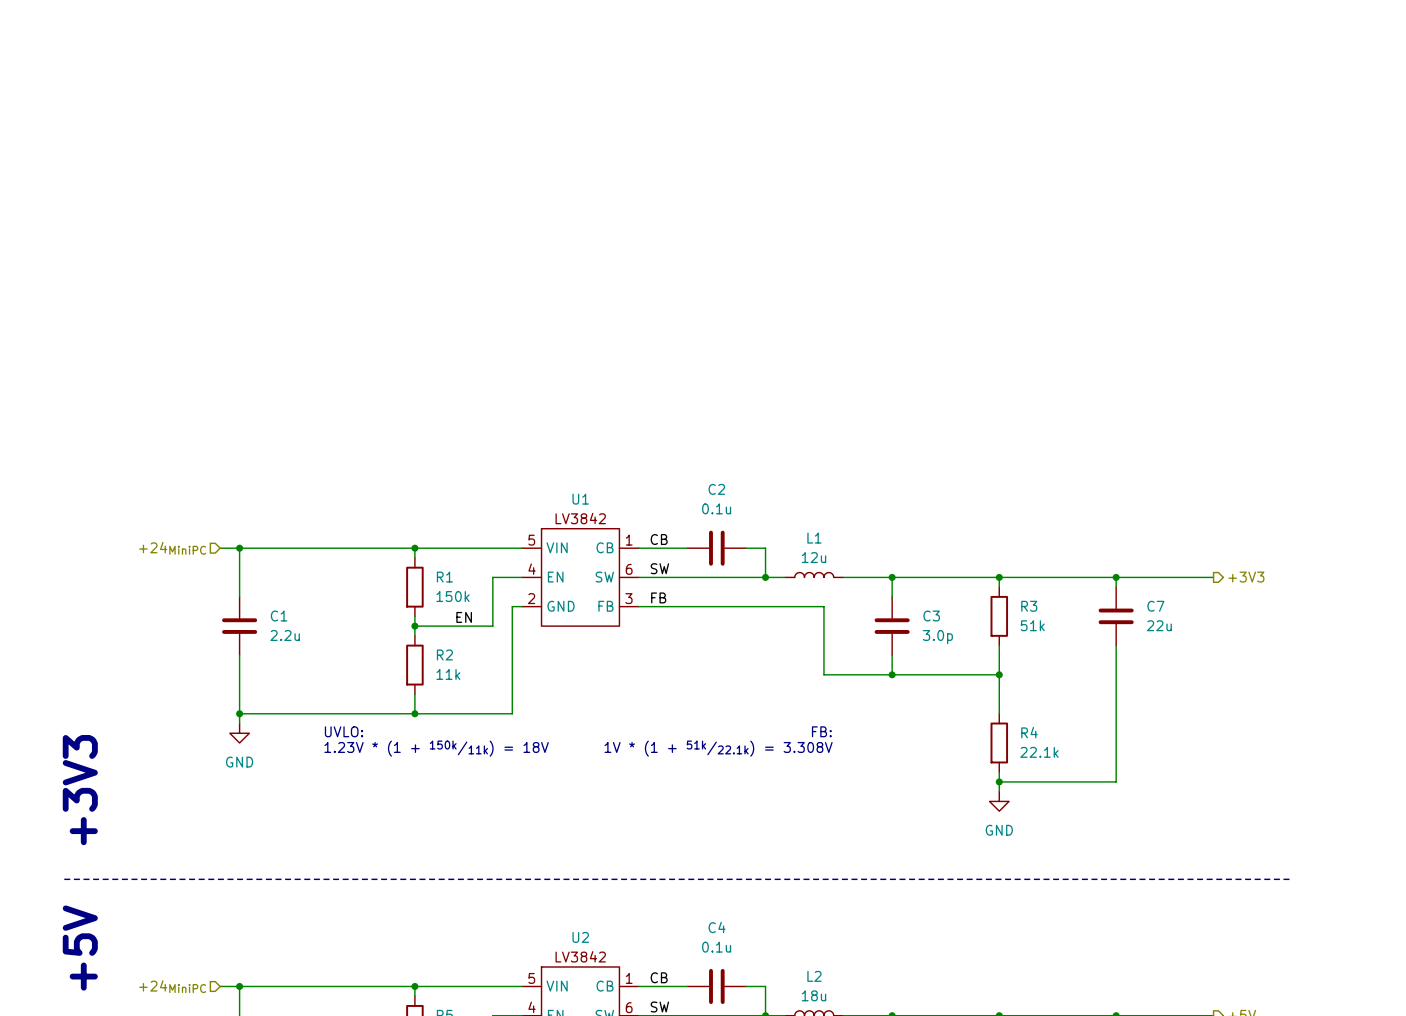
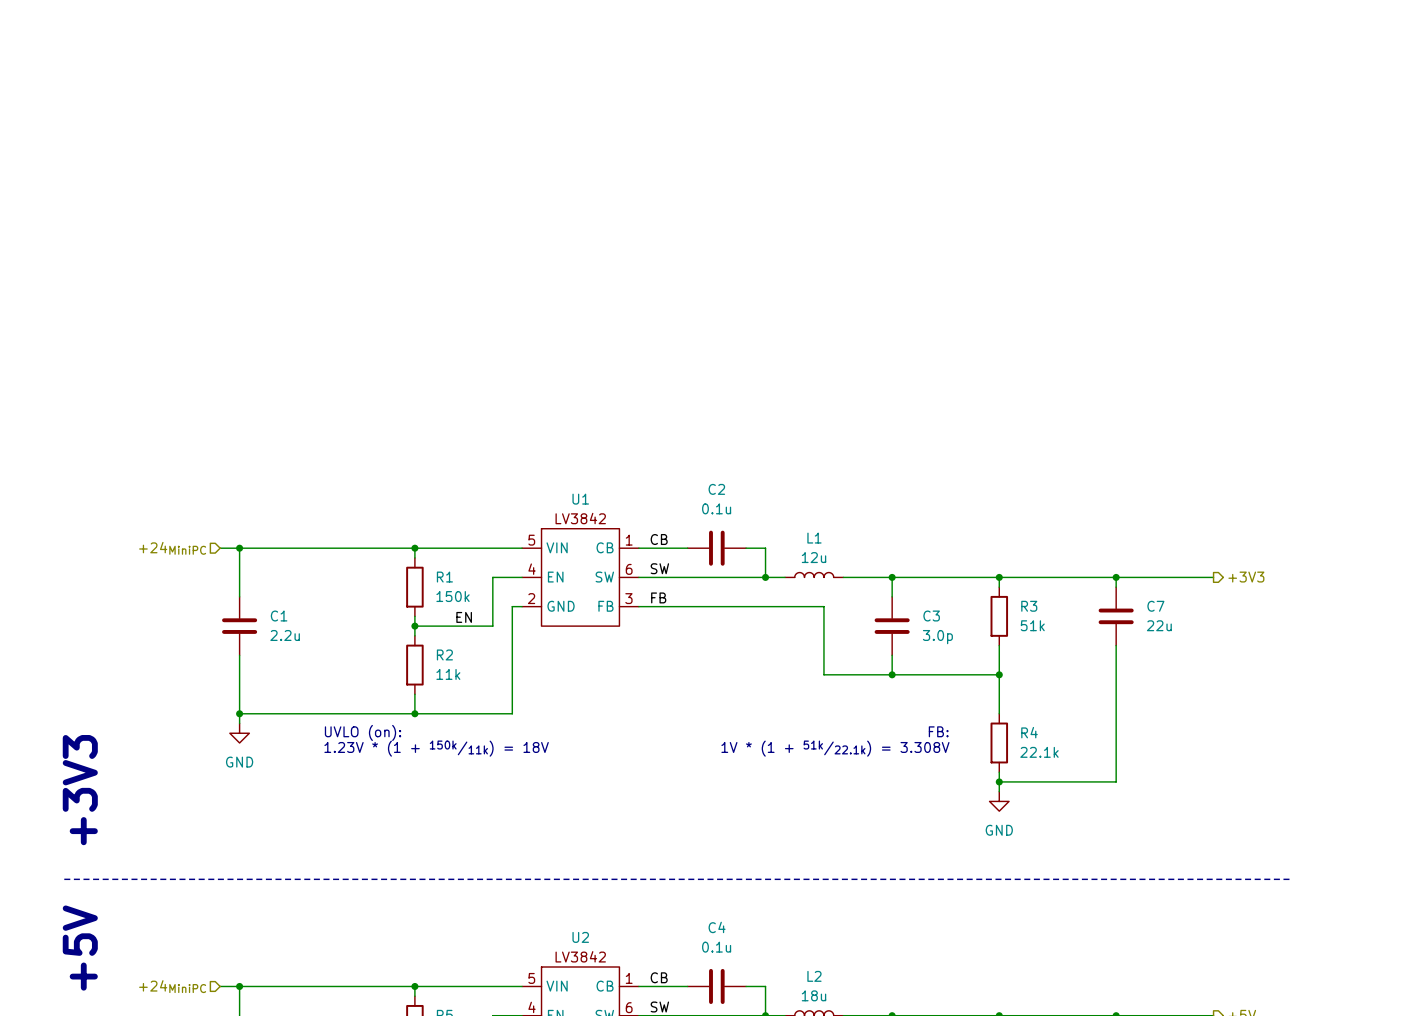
text: UVLO: (344, 731) -> UVLO (on): (363, 732)
text position: FB: (821, 731) -> FB: (938, 731)
text position: 1V * (1 + 51k/22.1k) = 3.308V (718, 748) -> 1V * (1 + 51k/22.1k) = 3.308V (835, 748)

